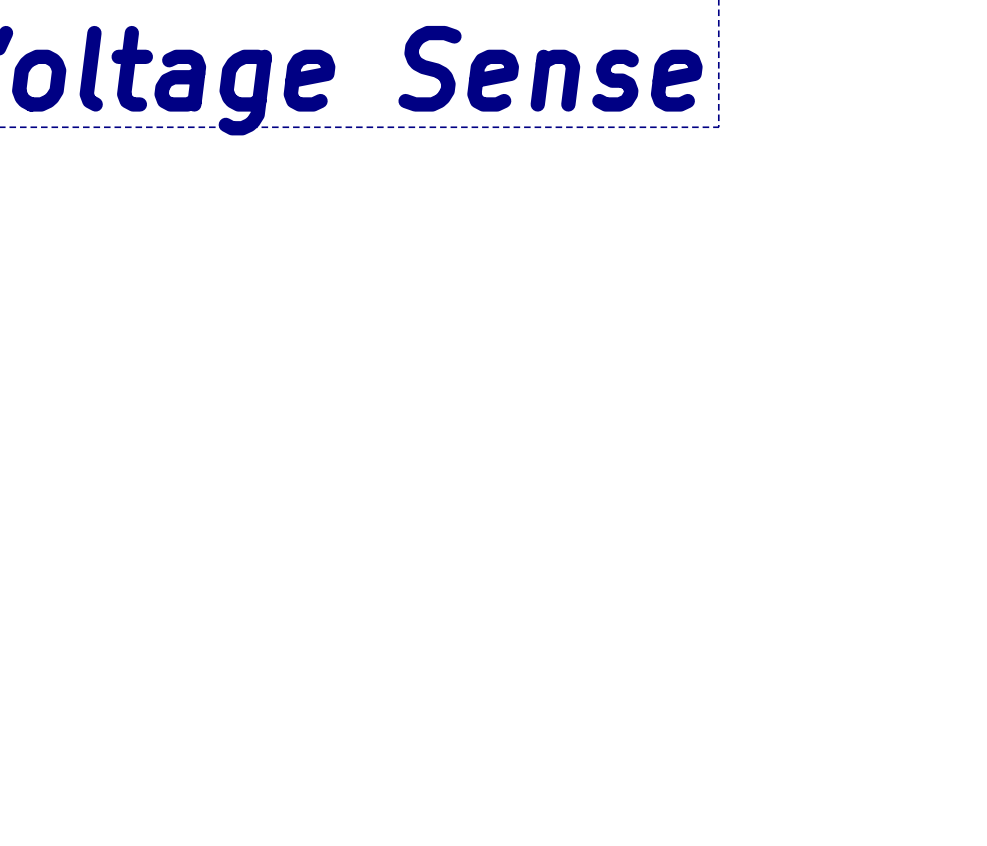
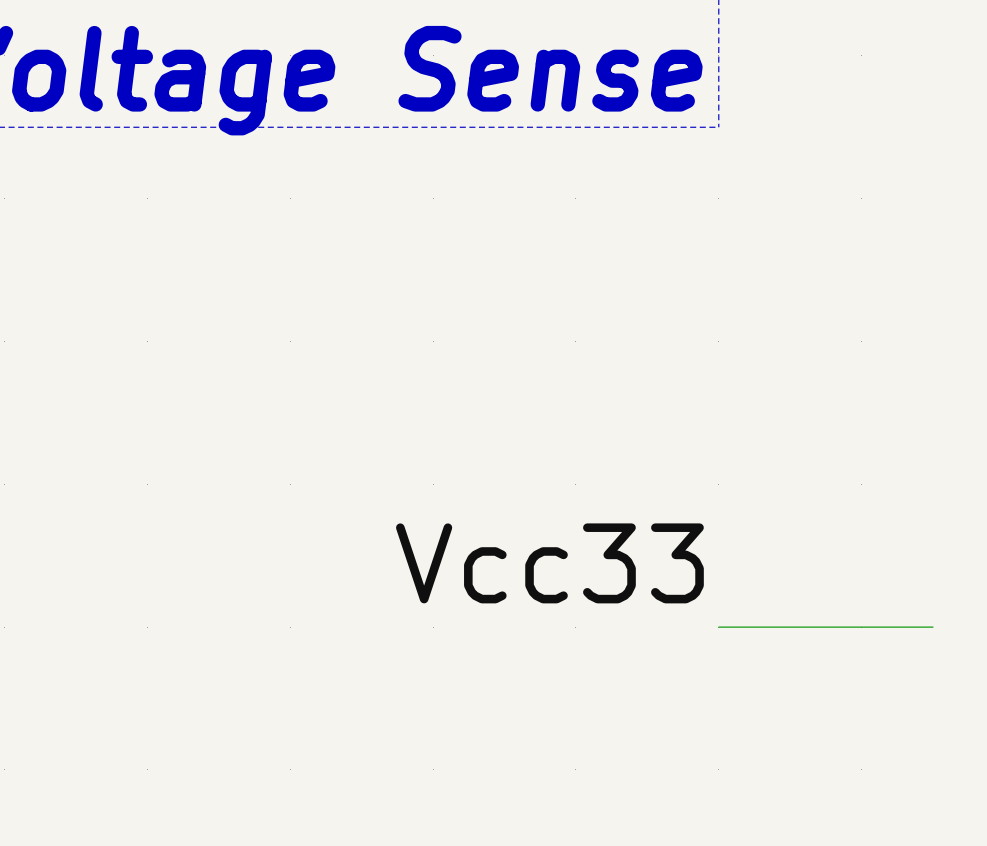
label: none -> Vcc33 (549, 563)
wire: none -> (718, 627) (933, 627)

